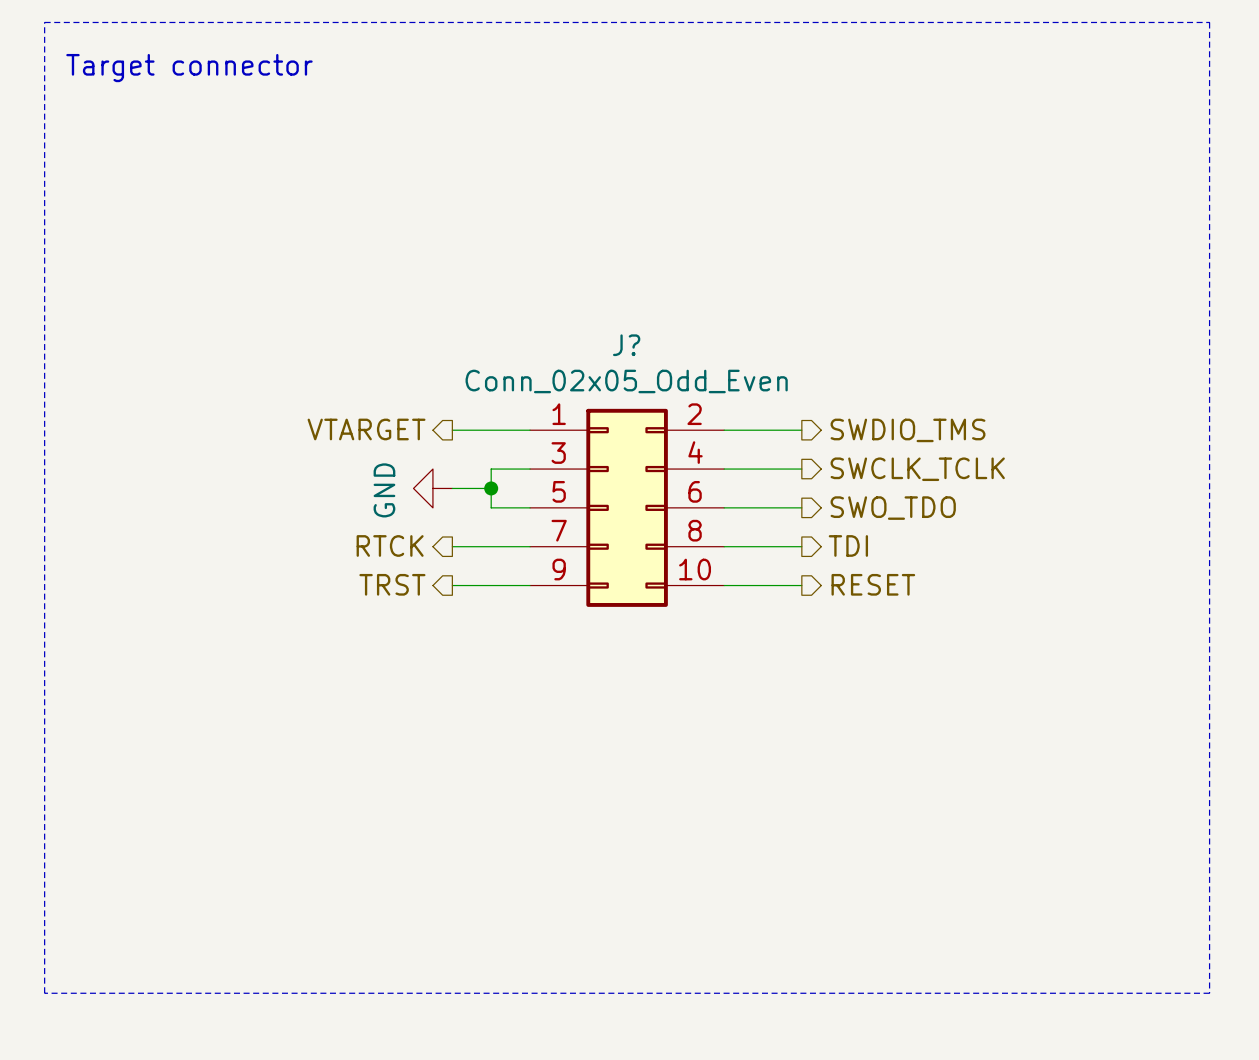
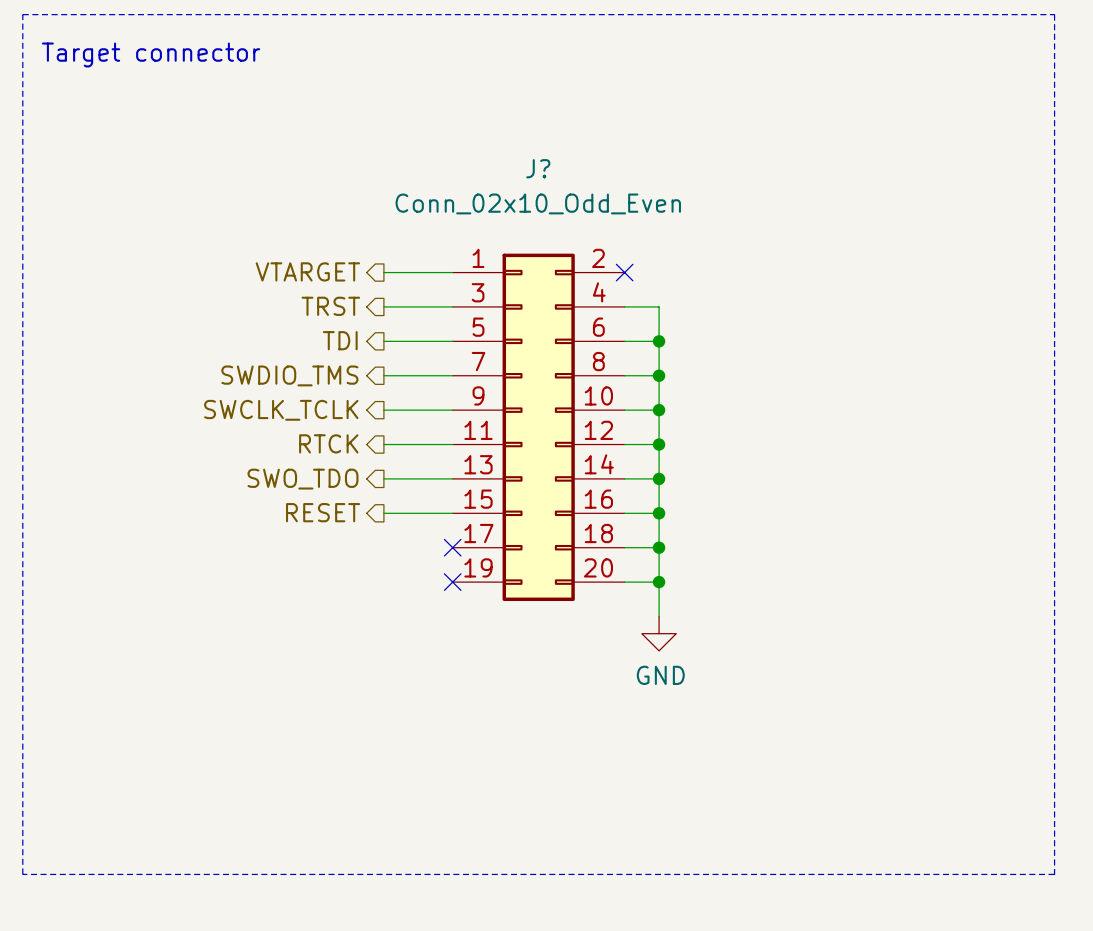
hierarchical label: none -> VTARGET (307, 271)
wire: none -> (383, 272) (452, 272)
no-connect mark: none -> (624, 272)
hierarchical label: none -> TRST (330, 306)
wire: none -> (383, 306) (452, 306)
wire: none -> (624, 306) (659, 306) (659, 616)
hierarchical label: none -> TDI (340, 340)
wire: none -> (383, 341) (452, 341)
junction: none -> (659, 341)
hierarchical label: VTARGET (366, 429) -> SWDIO_TMS (289, 375)
wire: (763, 430) (801, 430) -> (624, 341) (659, 341)
junction: none -> (659, 375)
hierarchical label: SWDIO_TMS (908, 430) -> none
hierarchical label: none -> SWCLK_TCLK (281, 410)
wire: (491, 469) (491, 507) -> (418, 410) (383, 410)
wire: (763, 469) (801, 469) -> none
junction: none -> (659, 410)
hierarchical label: SWCLK_TCLK (917, 469) -> none
power symbol: GND (432, 488) -> none
wire: (452, 488) (491, 488) -> none
junction: (491, 488) -> none
J?: none -> Conn_02x10_Odd_Even (538, 427)
hierarchical label: none -> RTCK (328, 443)
J?: Conn_02x05_Odd_Even (627, 507) -> none
wire: (763, 507) (801, 507) -> (383, 444) (418, 444)
junction: none -> (659, 444)
hierarchical label: SWO_TDO (893, 508) -> none
hierarchical label: RTCK (390, 545) -> SWO_TDO (302, 479)
hierarchical label: TDI (848, 545) -> none
wire: (763, 546) (801, 546) -> (624, 547) (659, 547)
junction: none -> (659, 478)
hierarchical label: TRST (392, 584) -> RESET (323, 512)
hierarchical label: RESET (873, 584) -> none
wire: (763, 585) (801, 585) -> (624, 582) (659, 582)
junction: none -> (659, 513)
no-connect mark: none -> (452, 547)
junction: none -> (659, 547)
no-connect mark: none -> (452, 582)
junction: none -> (659, 582)
power symbol: none -> GND (659, 633)

